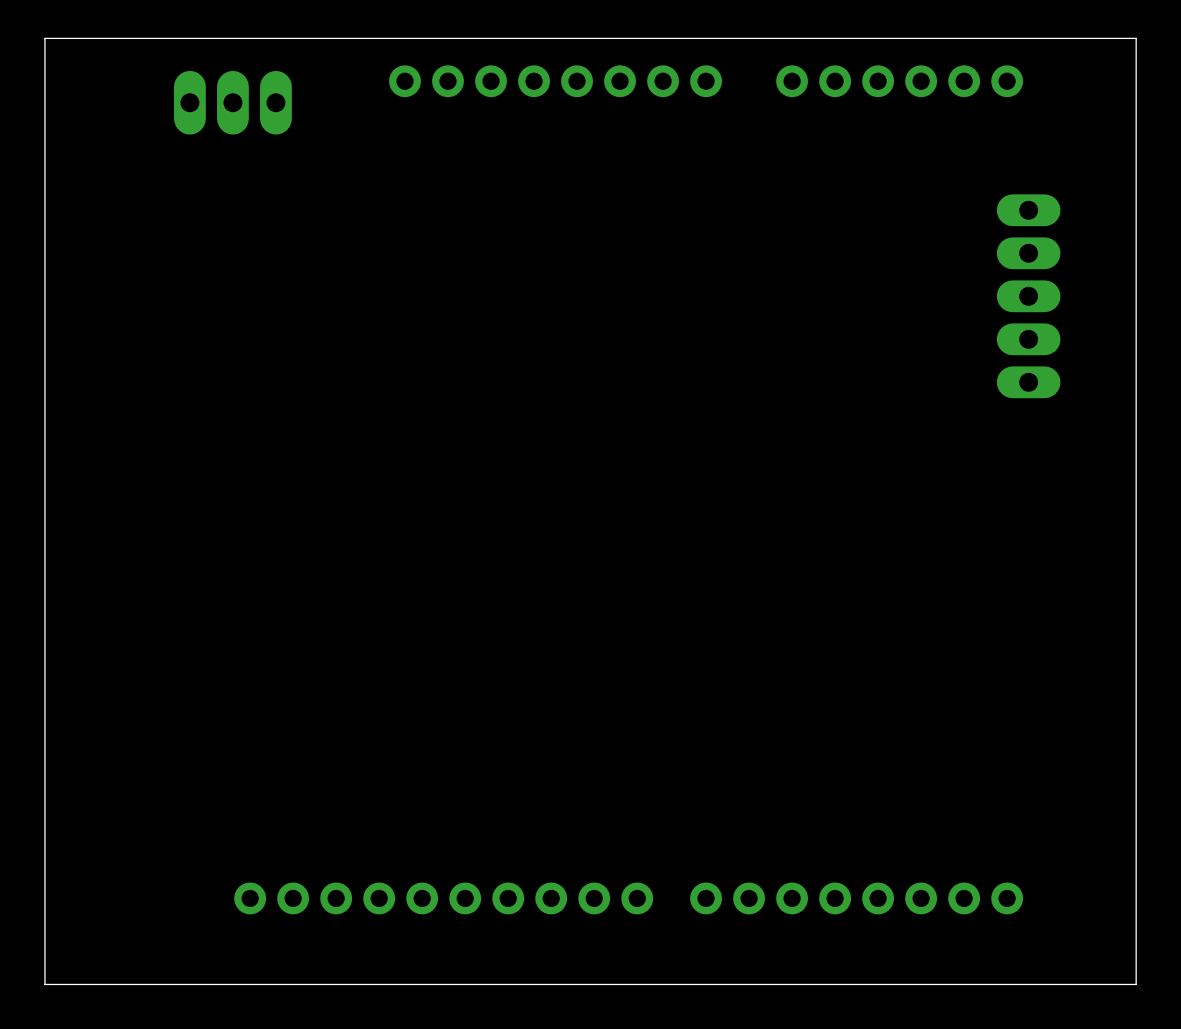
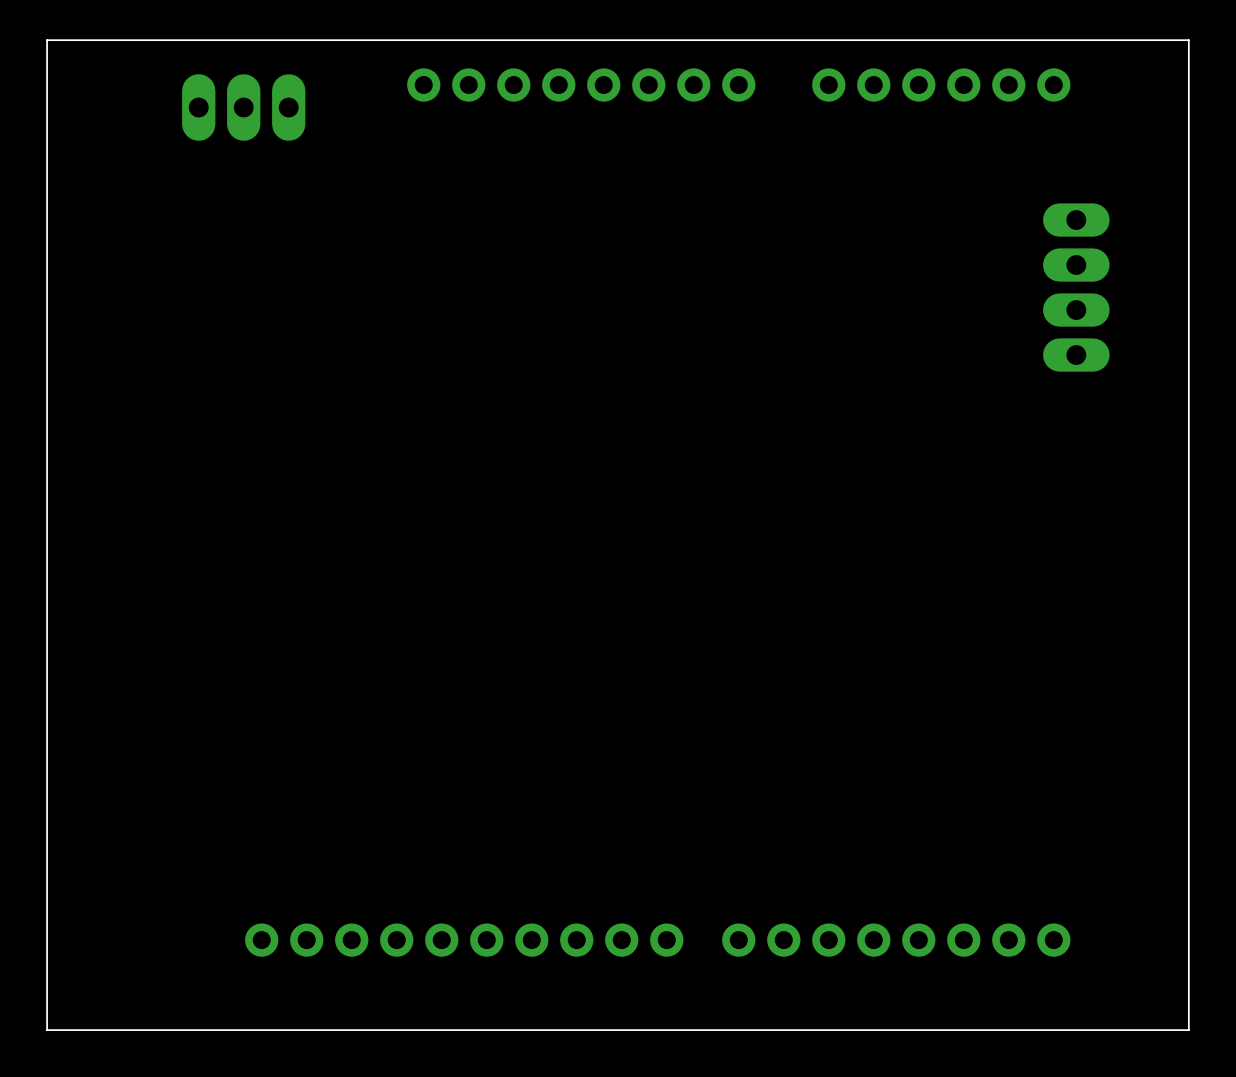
part: (1028, 296) -> none

